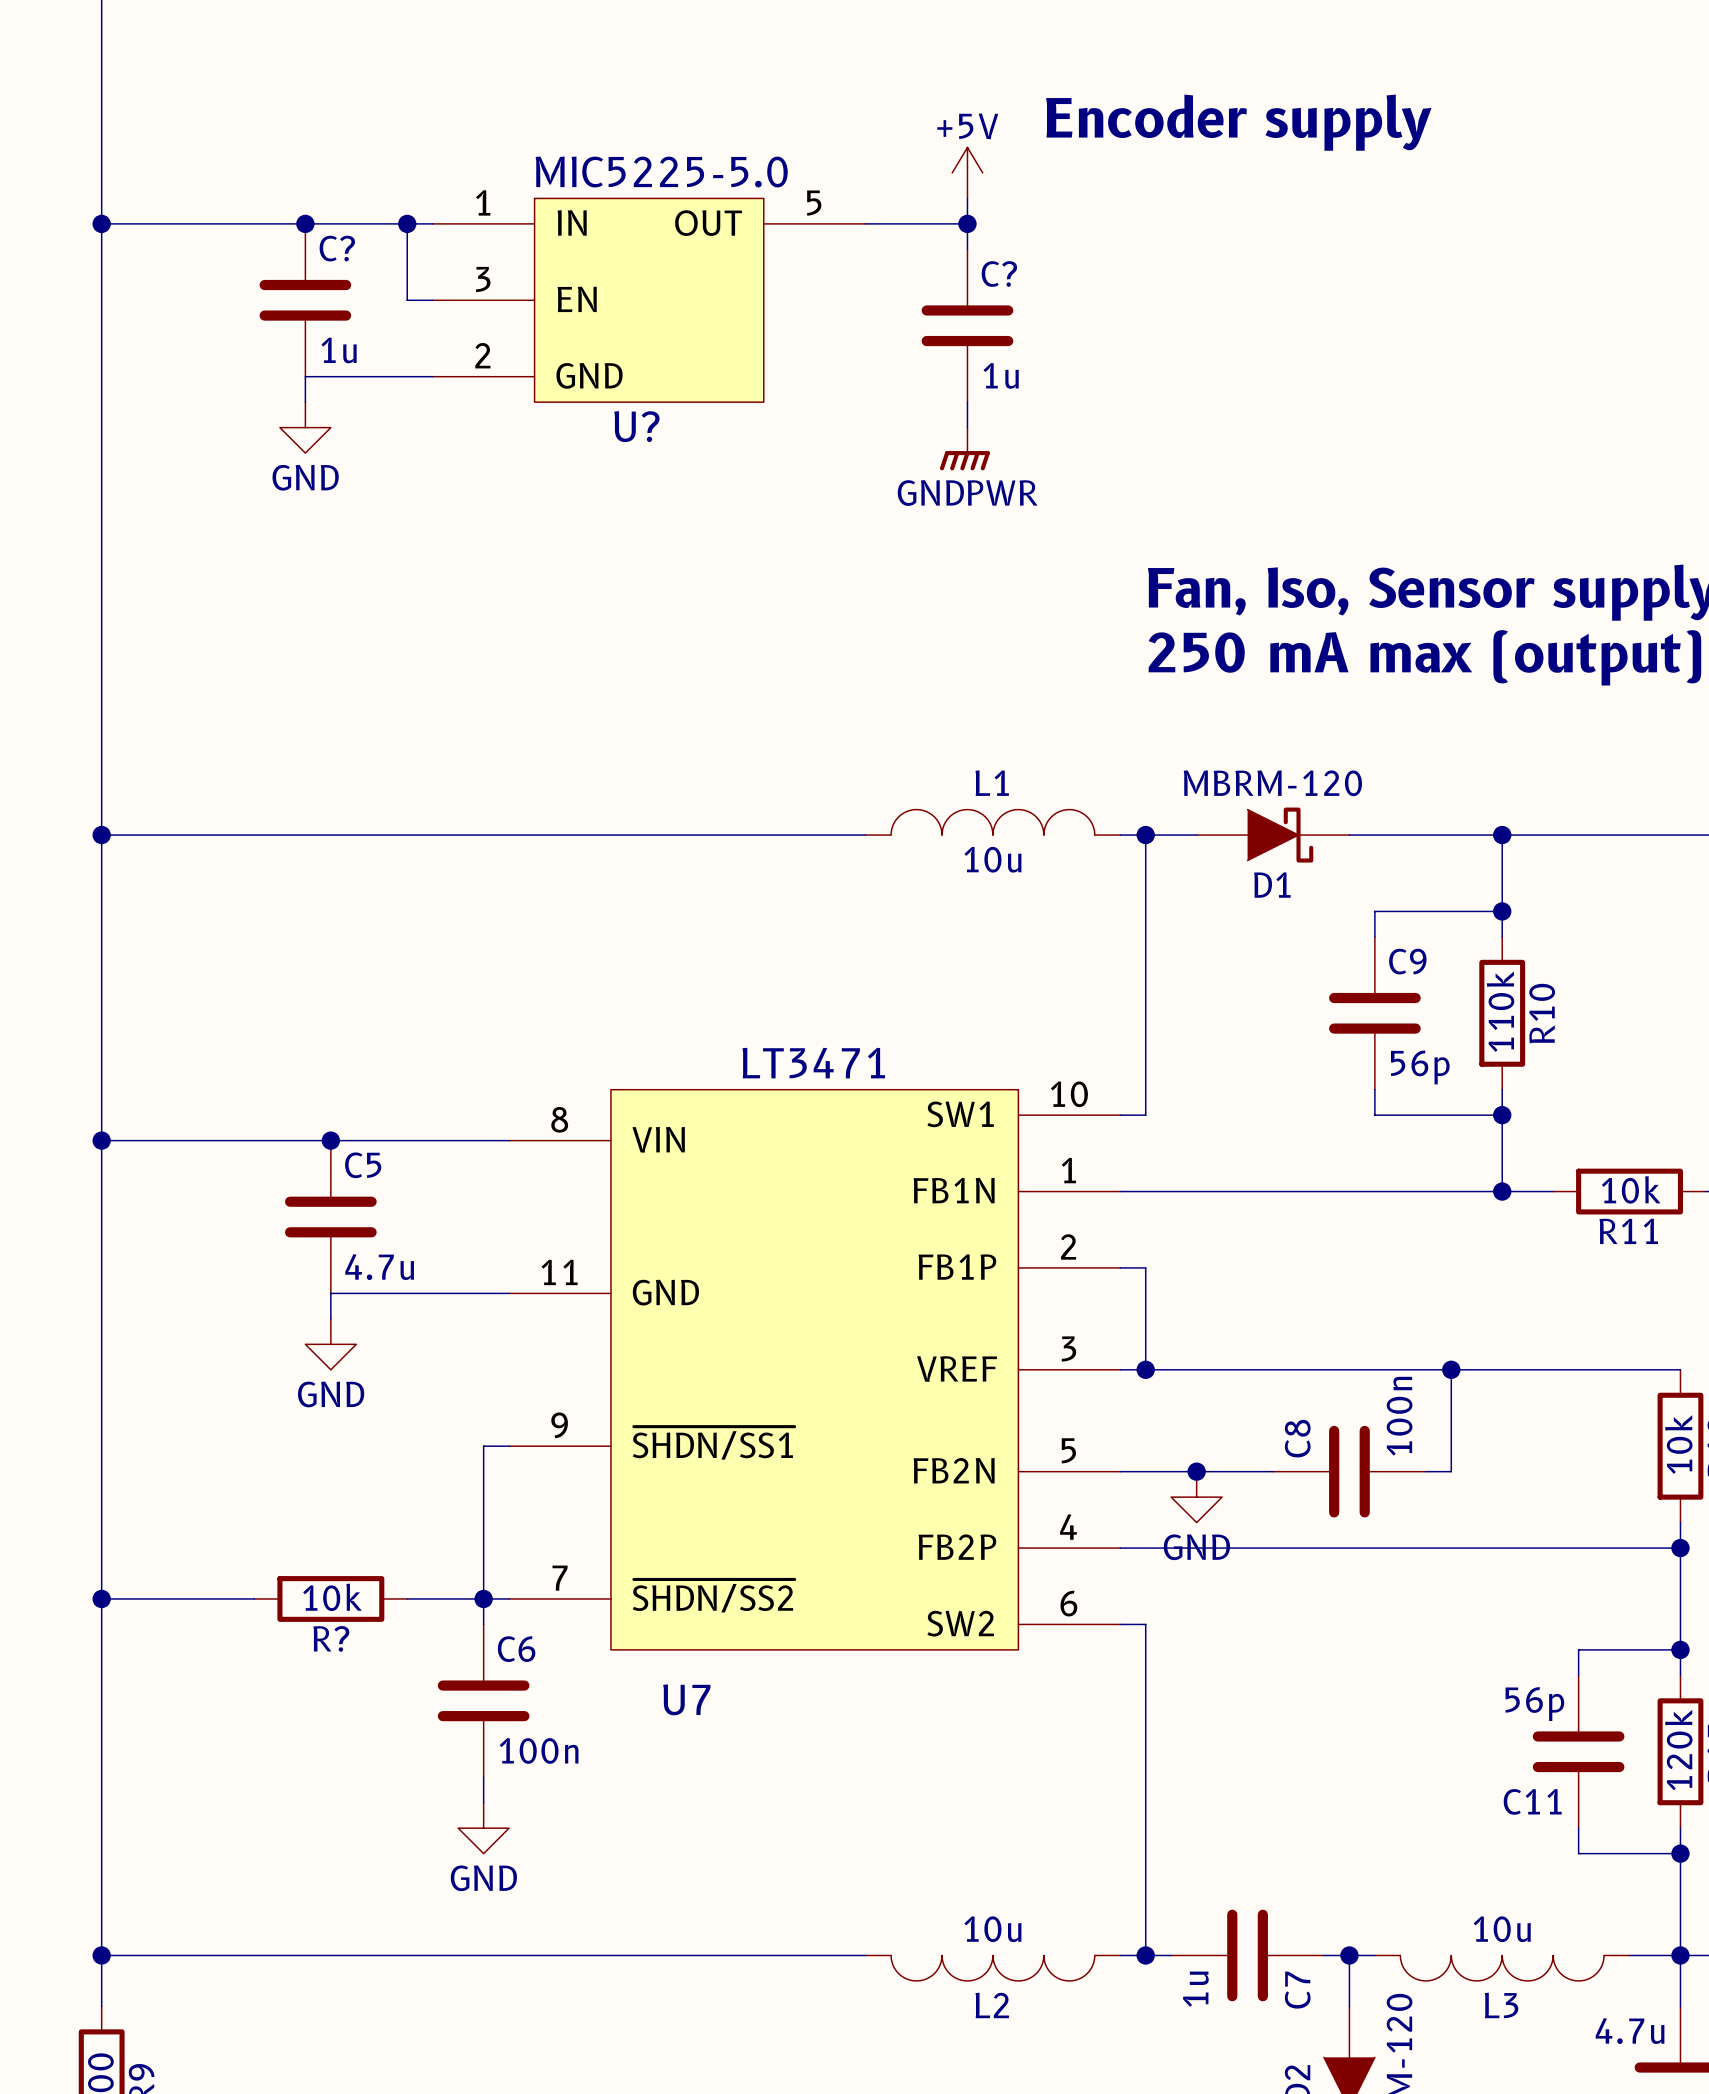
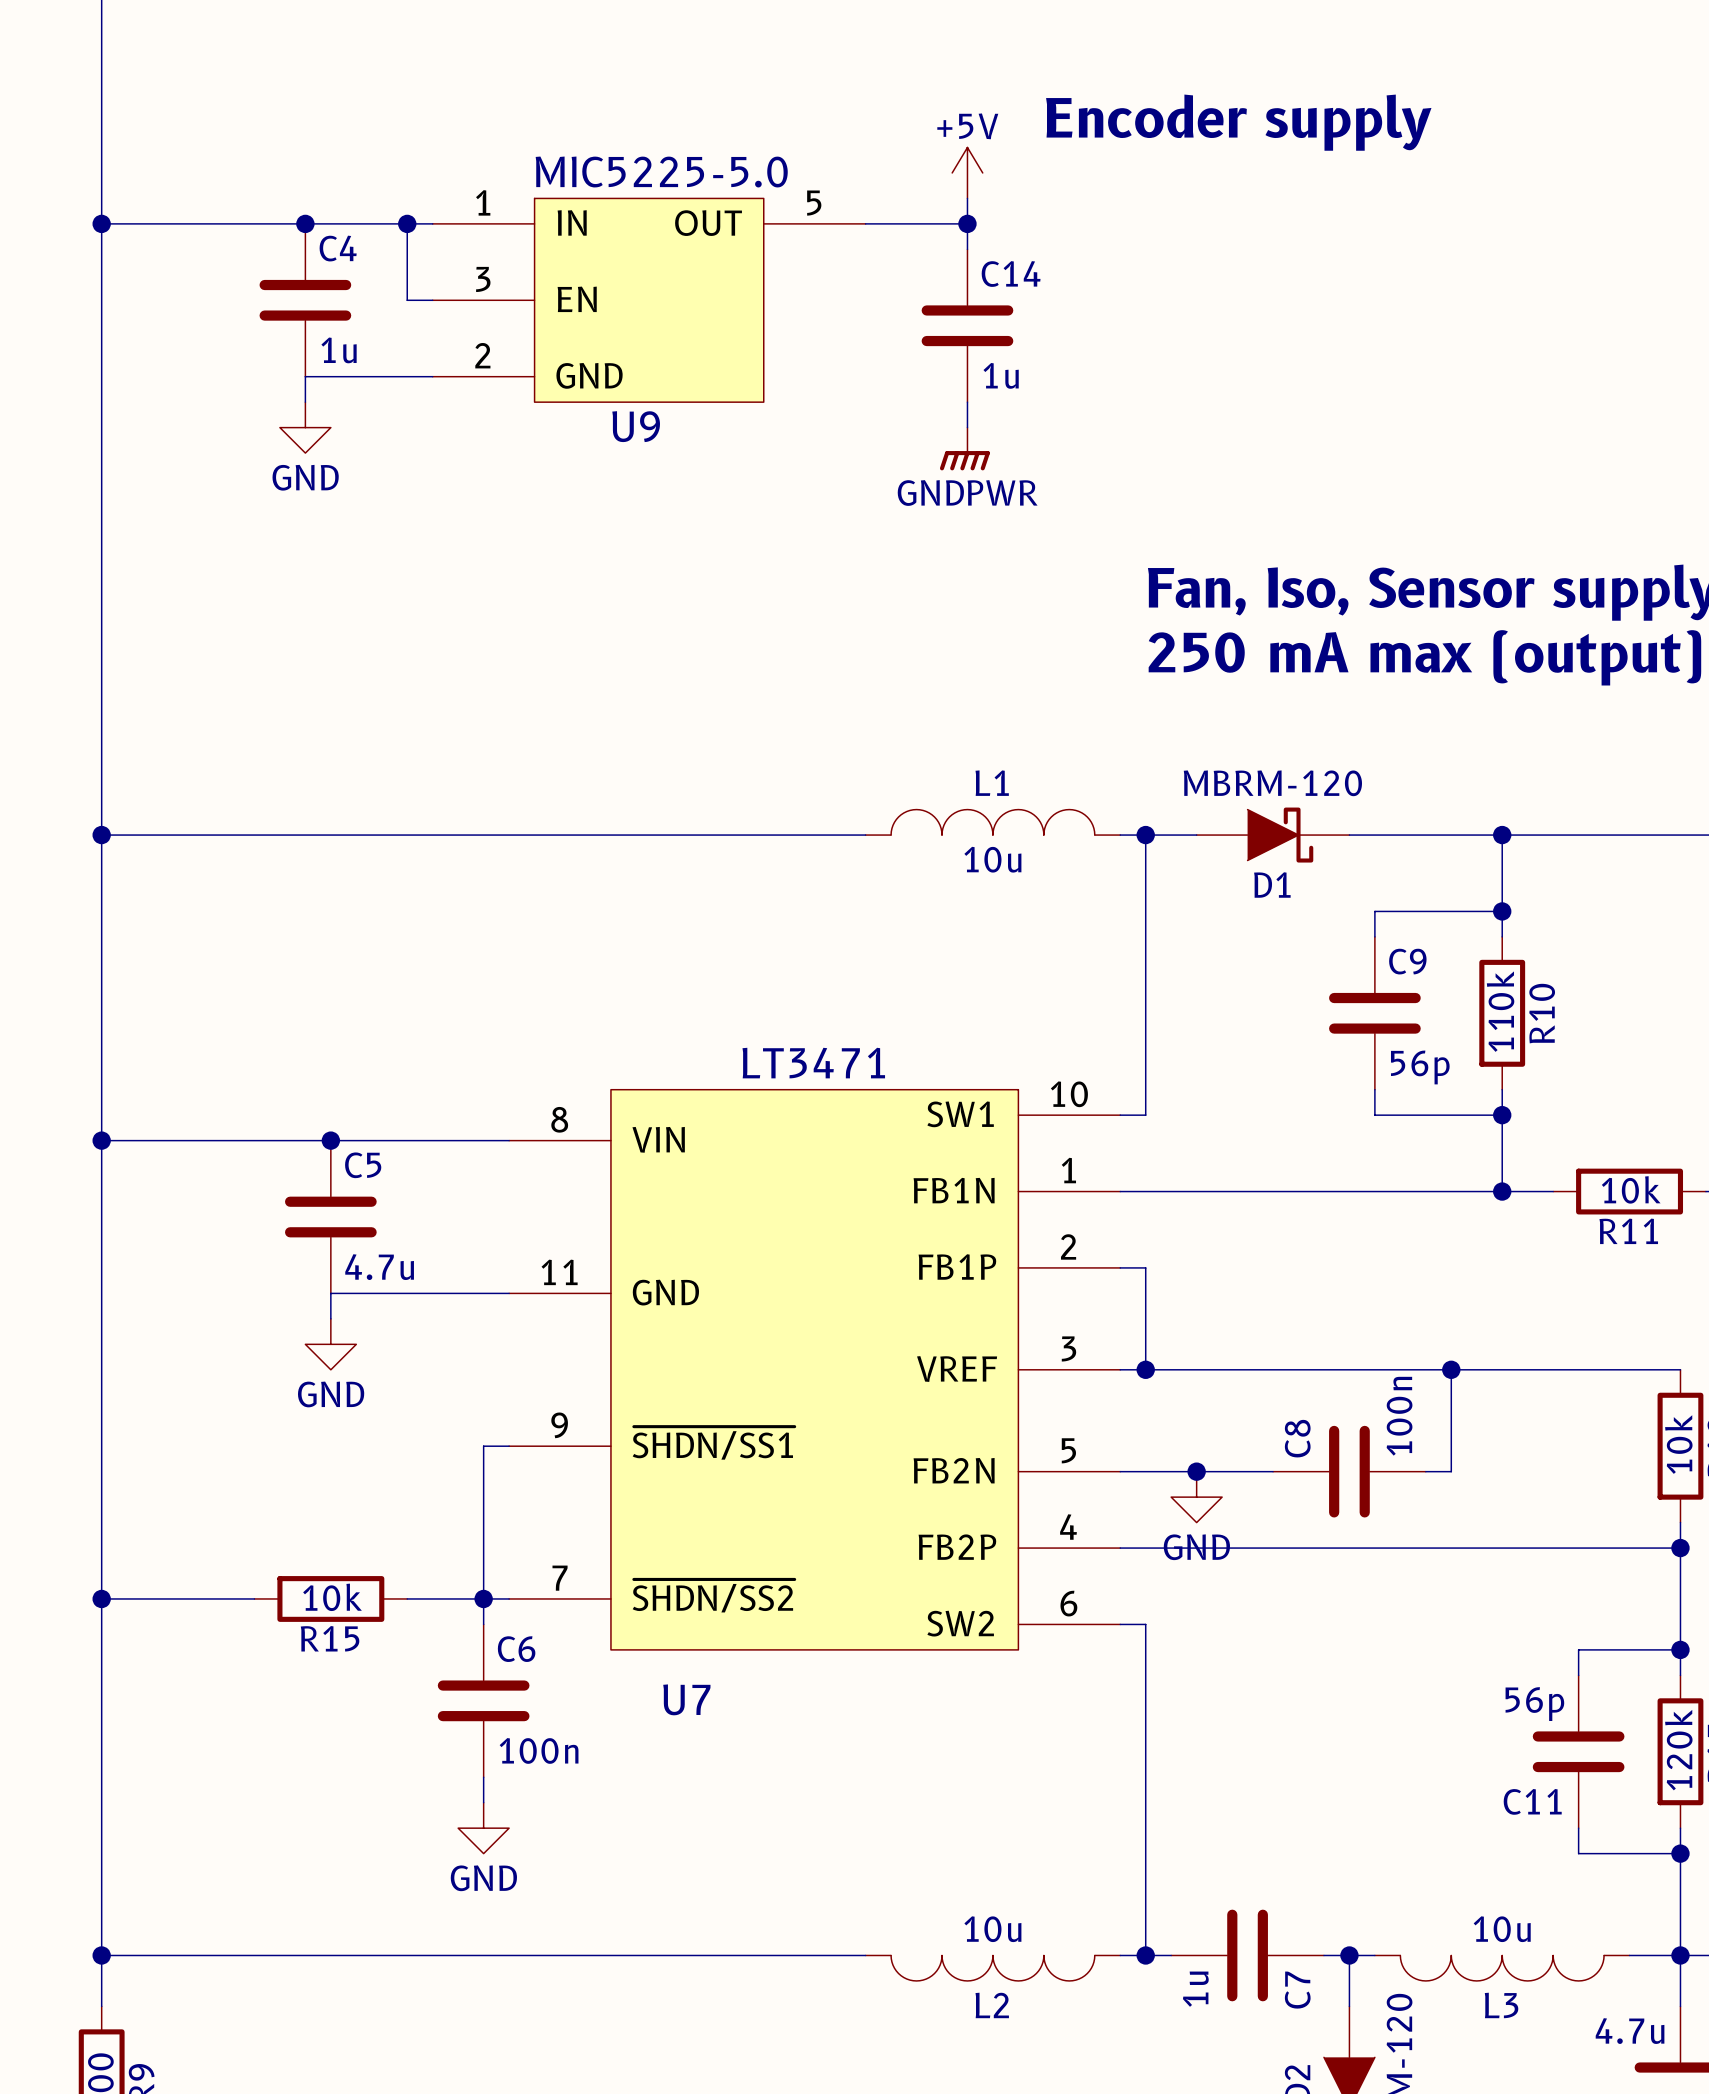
C? name: C? (337, 248) -> C4 (338, 248)
C? name: C? (999, 274) -> C14 (1011, 274)
U? name: U? (636, 426) -> U9 (636, 426)
R? name: R? (331, 1638) -> R15 (330, 1638)

